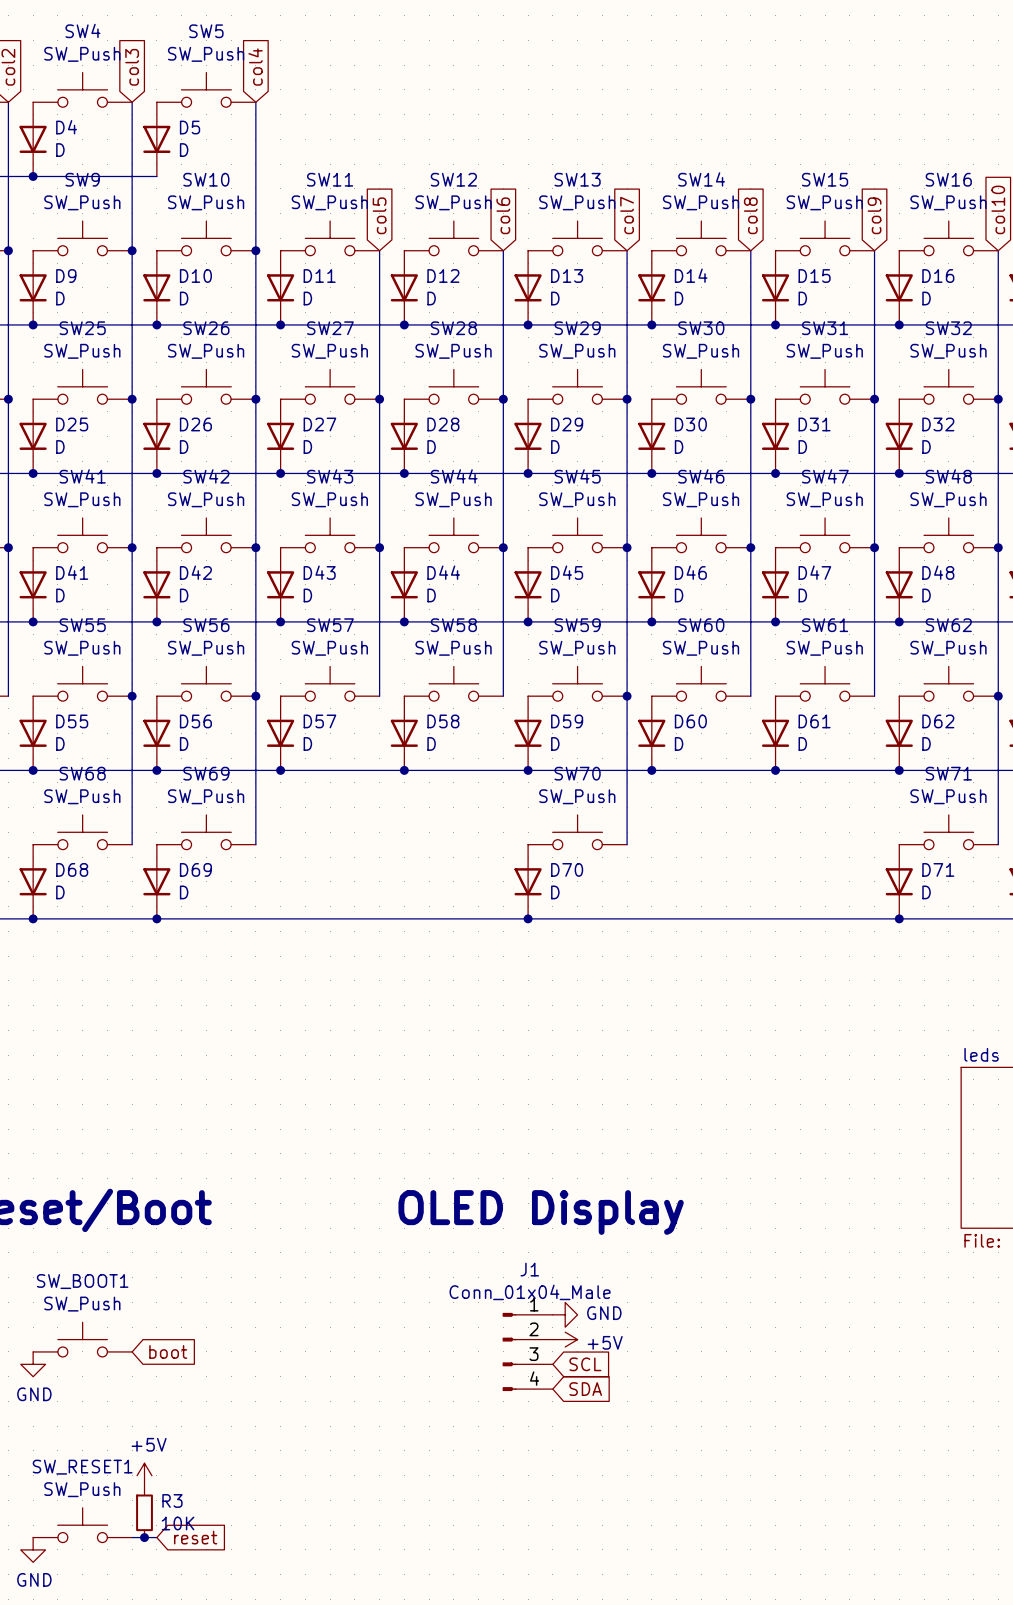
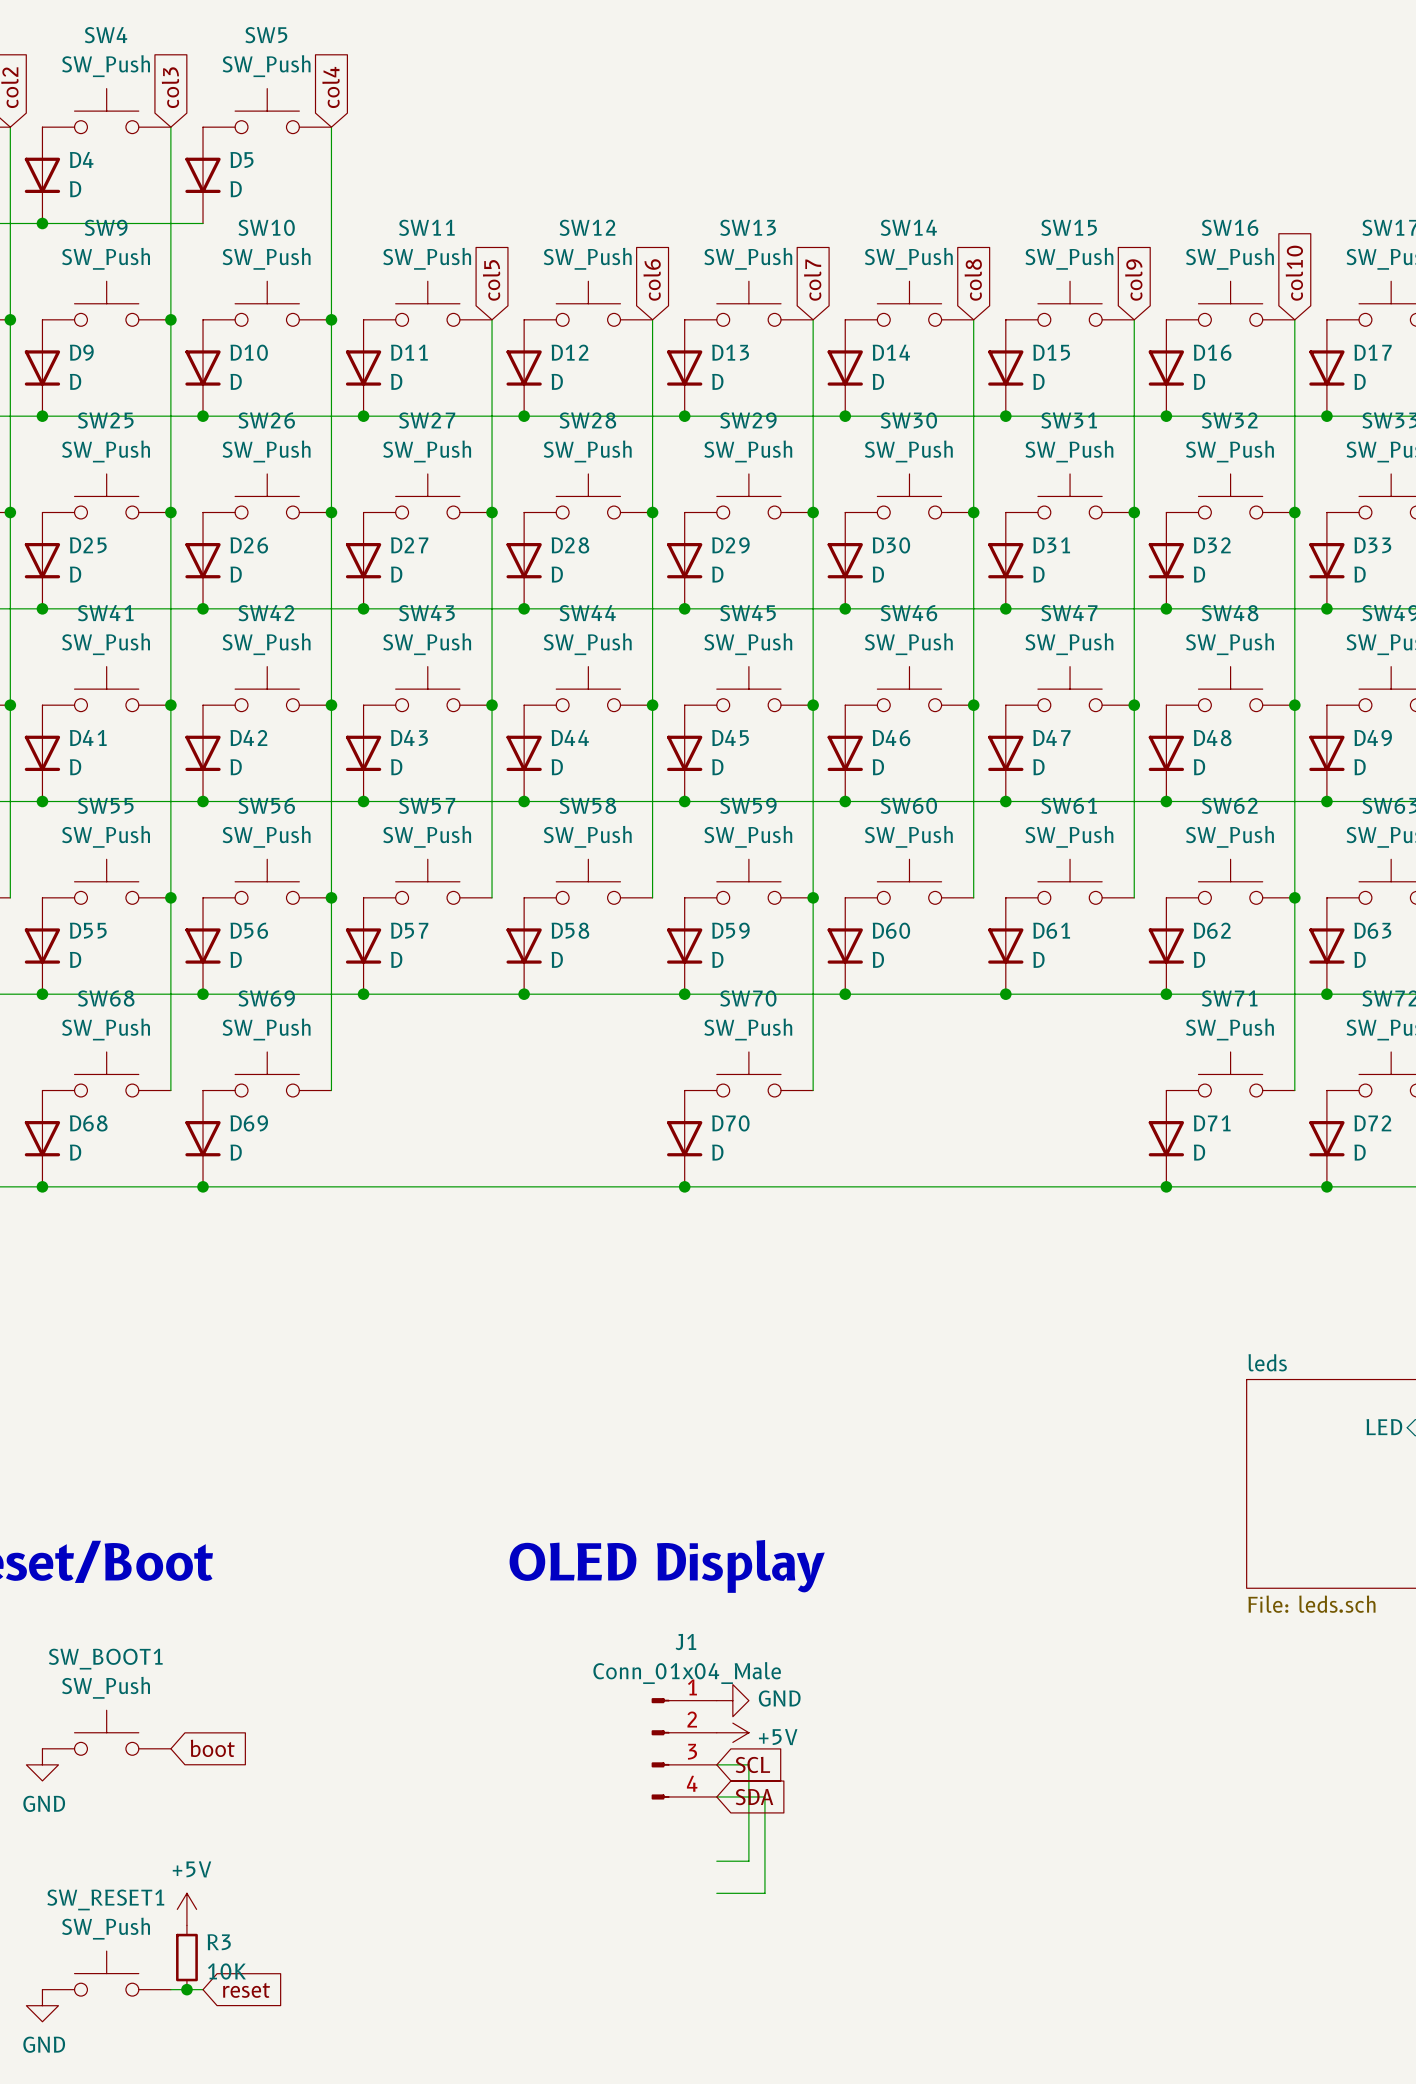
wire: none -> (716, 1764) (748, 1764) (748, 1861) (716, 1861)
wire: none -> (716, 1796) (764, 1796) (764, 1893) (716, 1893)

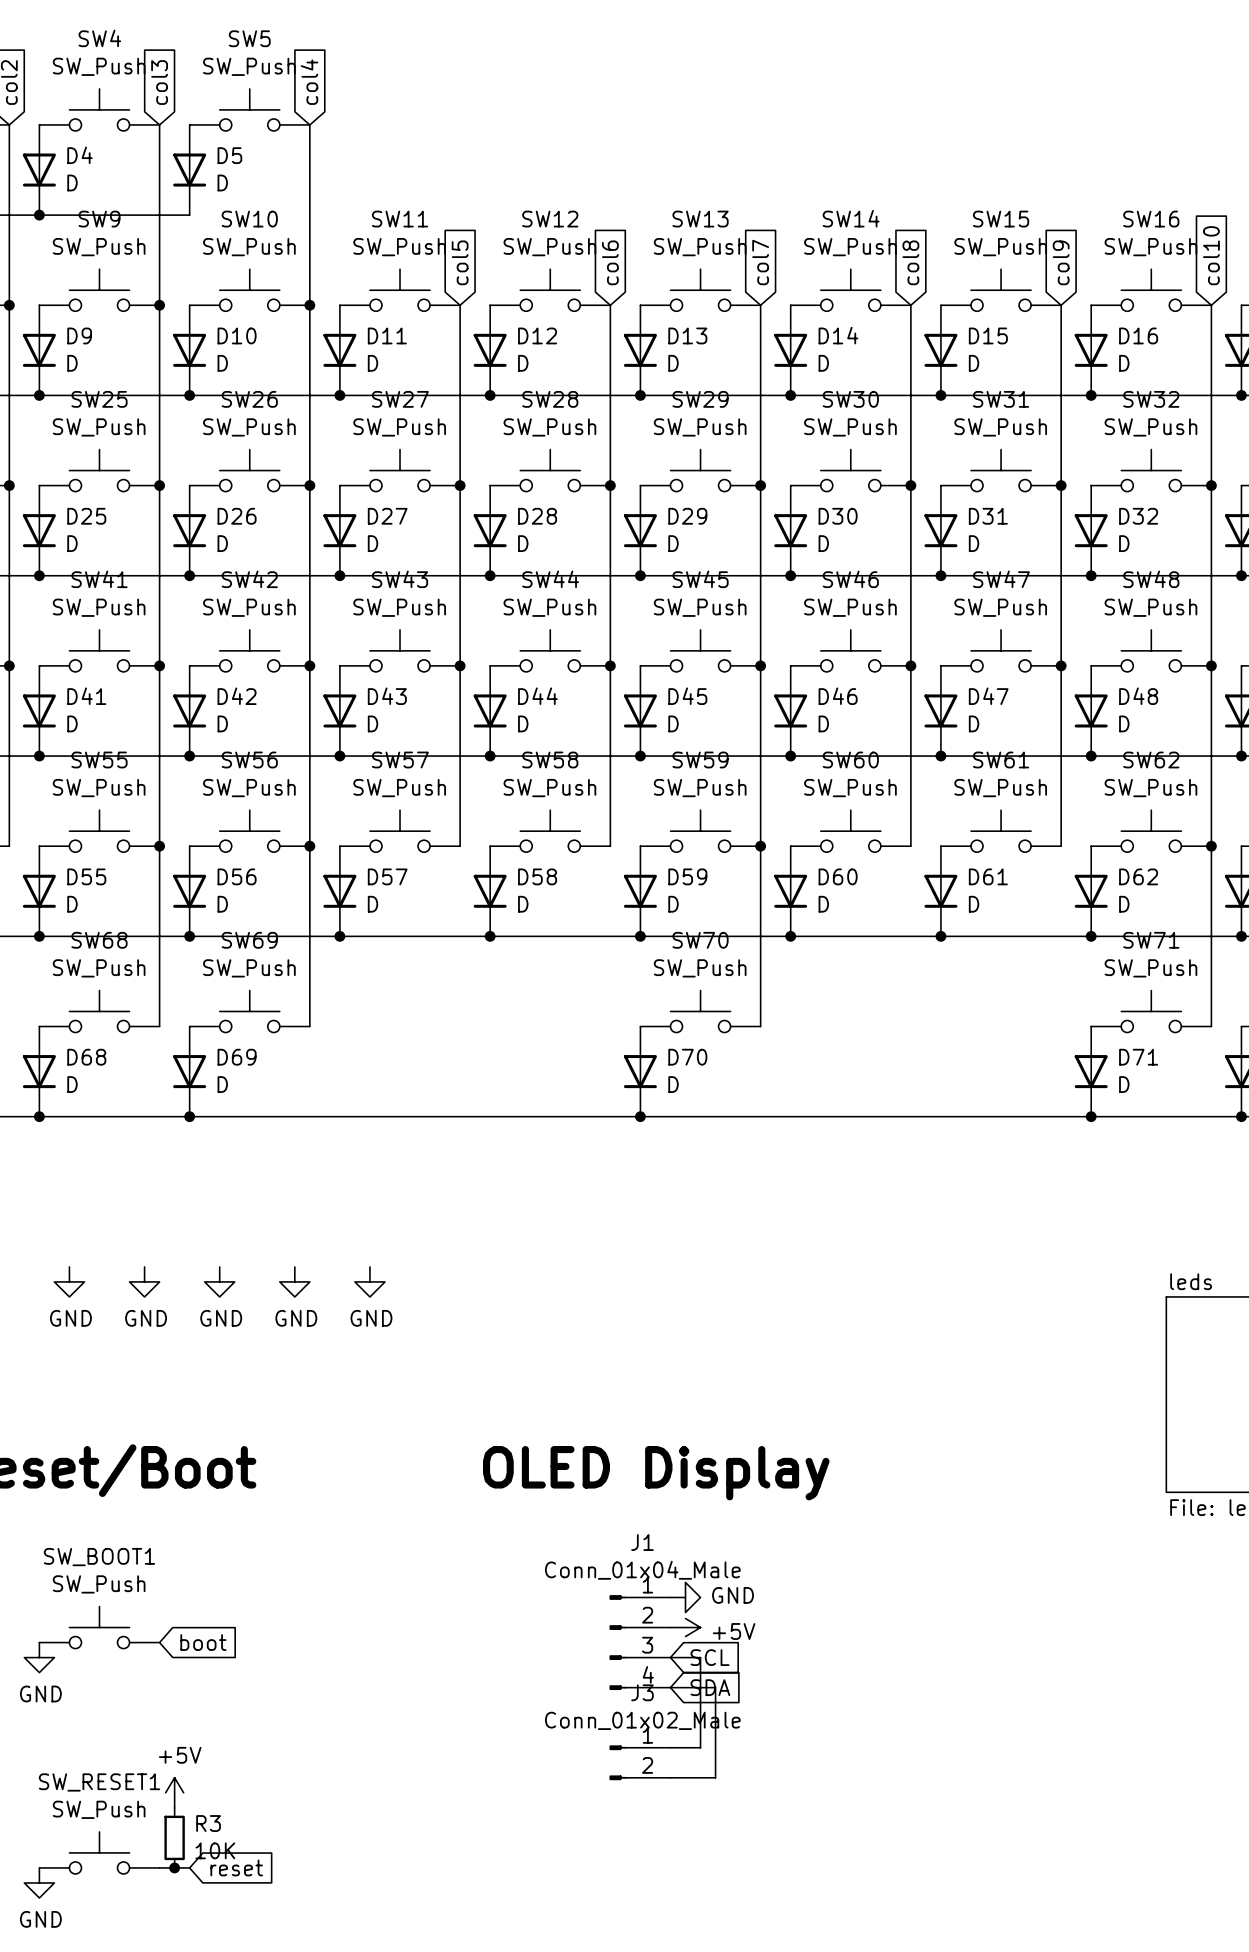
power symbol: none -> GND (69, 1281)
power symbol: none -> GND (144, 1281)
power symbol: none -> GND (219, 1281)
power symbol: none -> GND (294, 1281)
power symbol: none -> GND (369, 1281)
J3: none -> Conn_01x02_Male (639, 1762)

